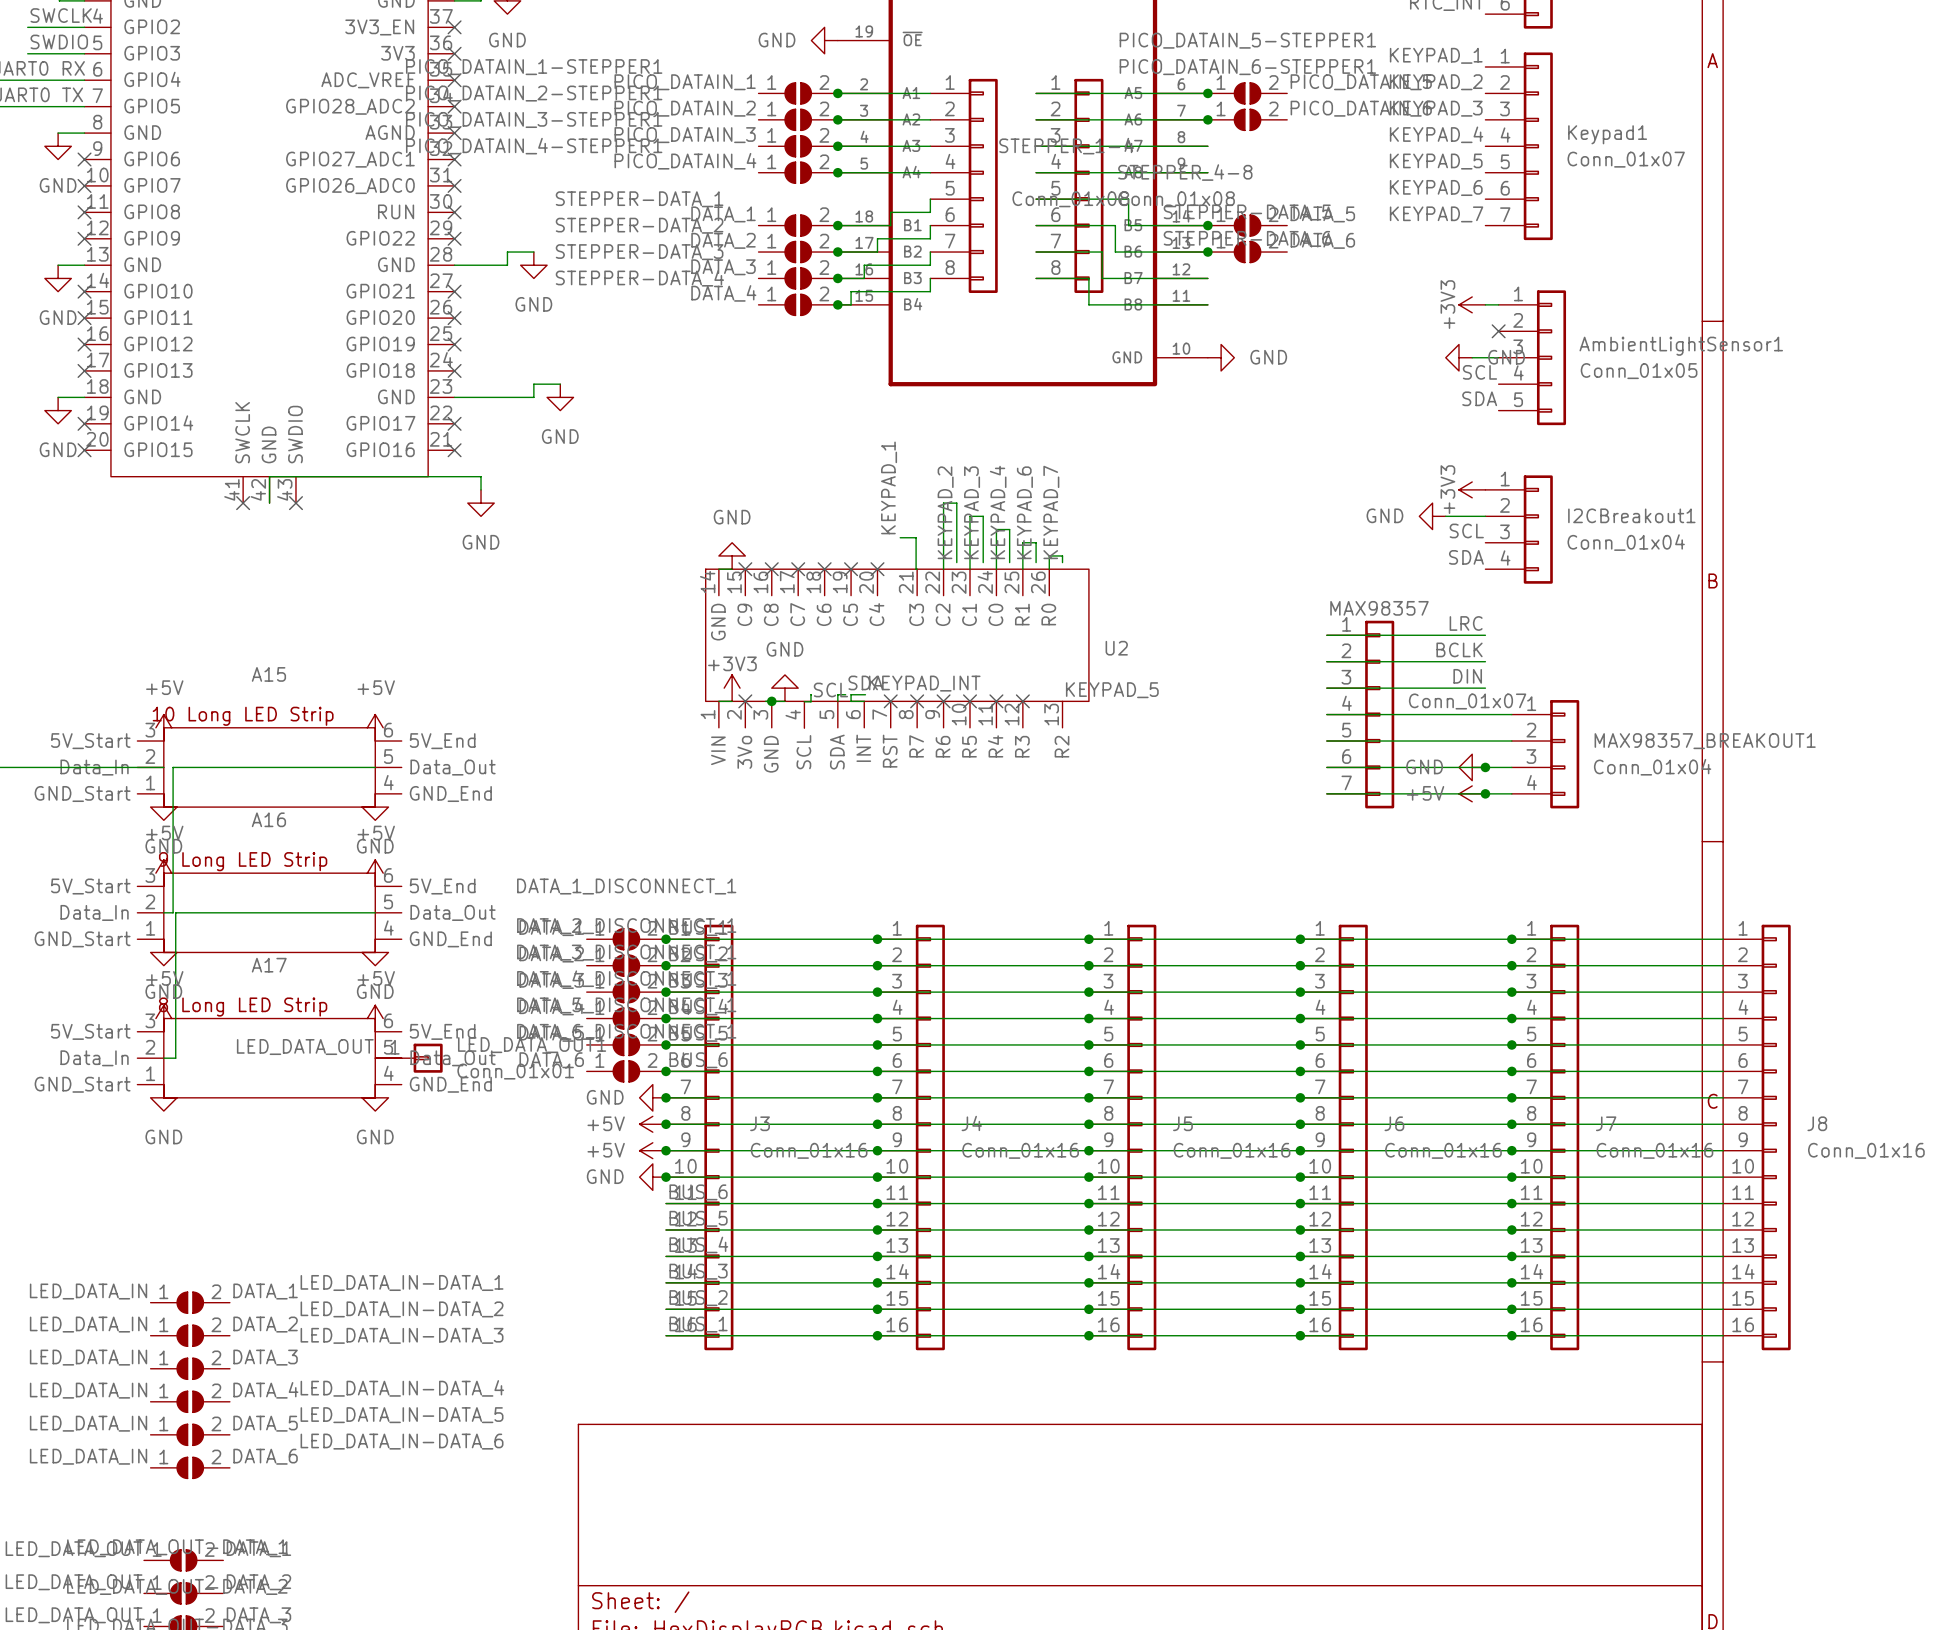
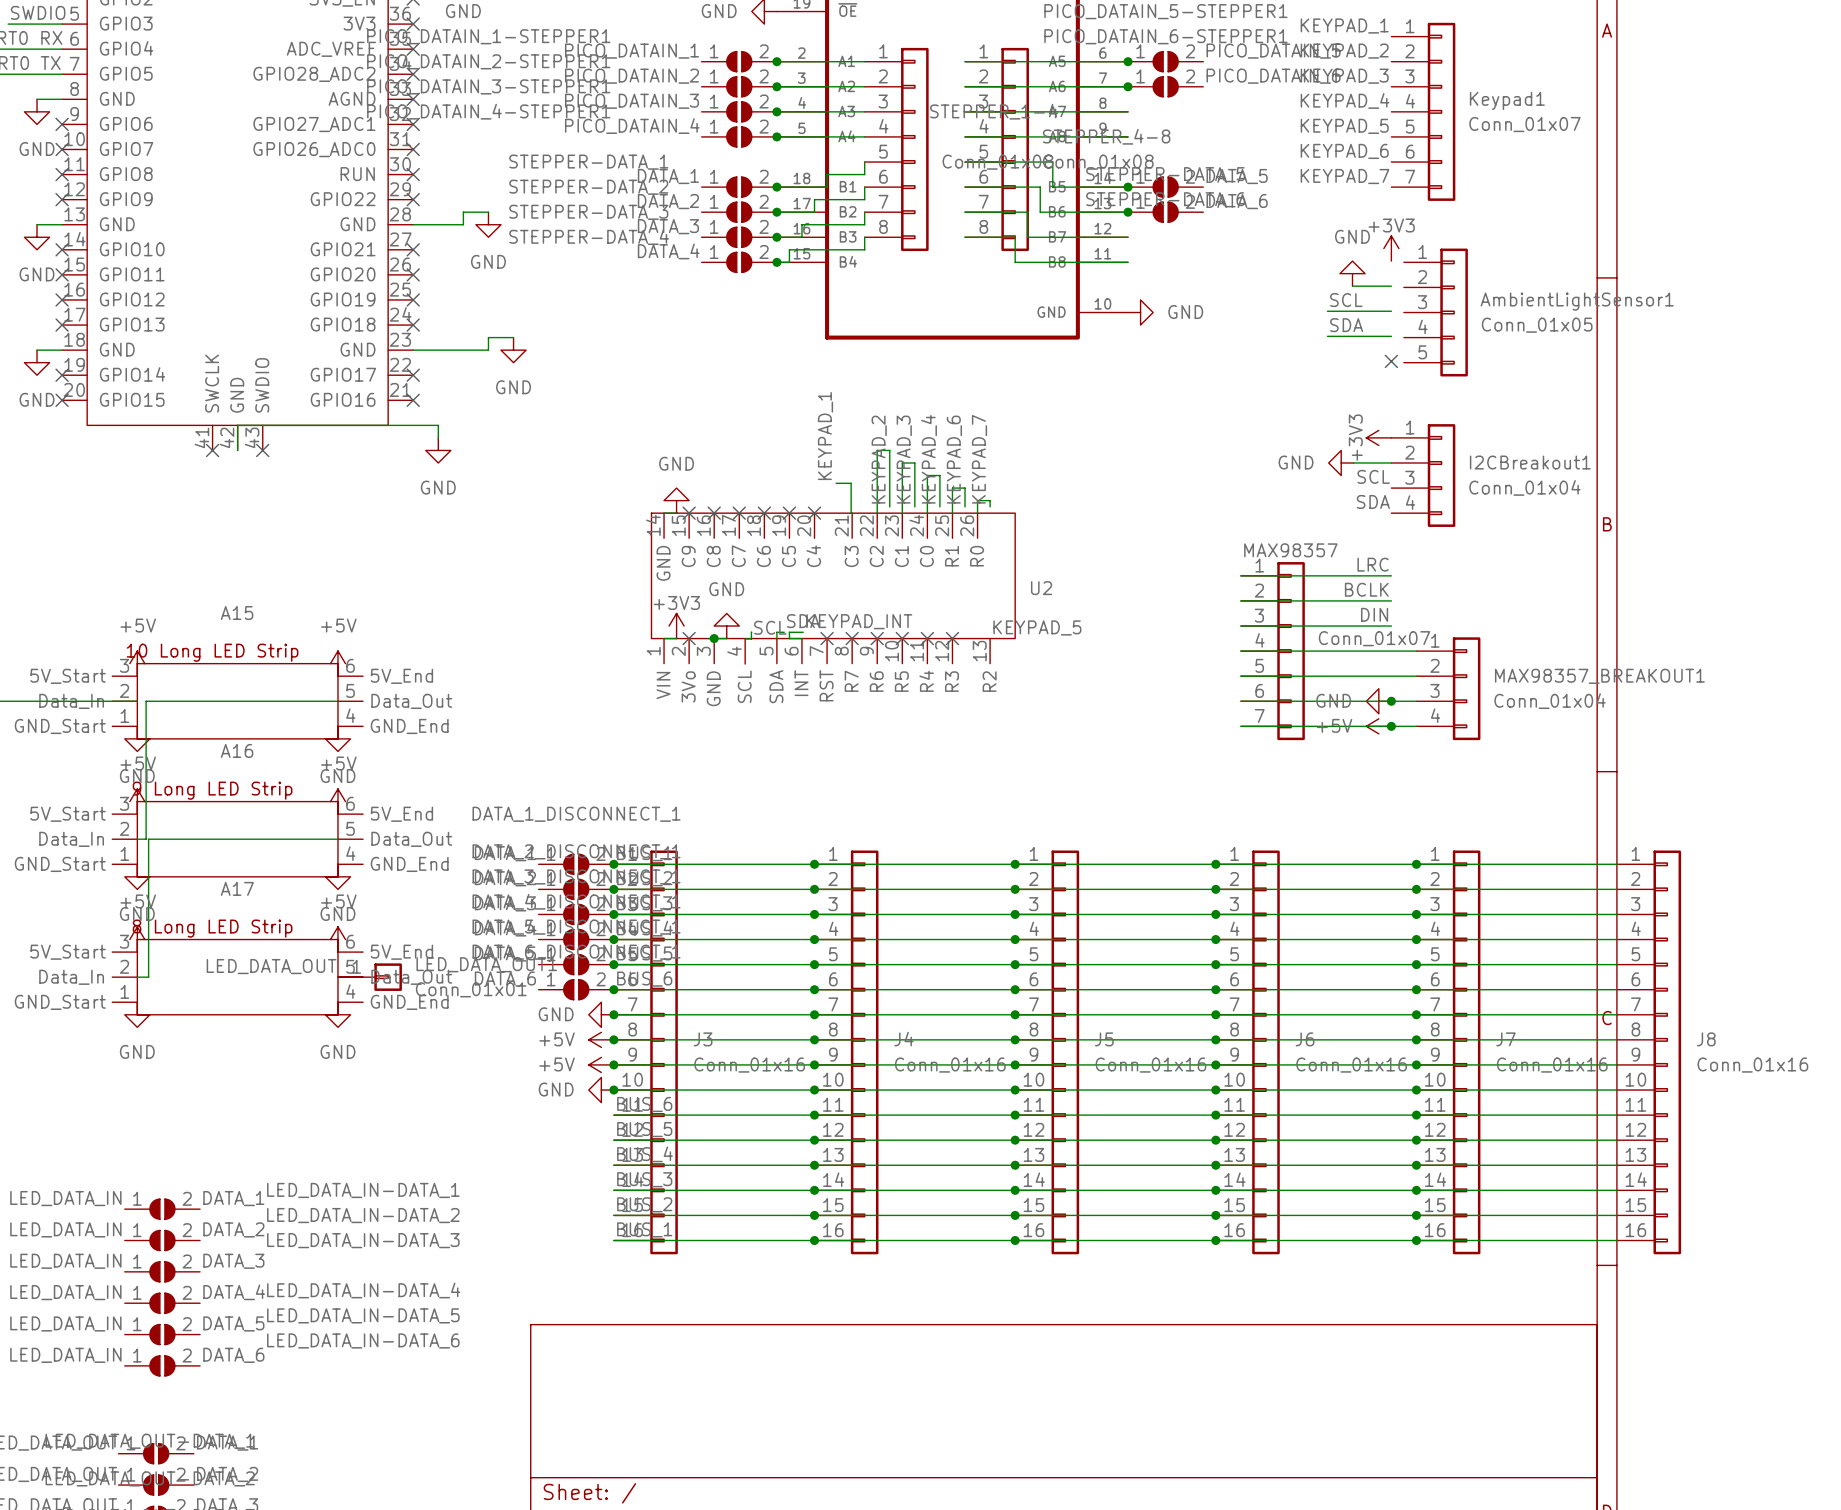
power symbol rotation: 0° (1472, 304) -> 90° clockwise (1391, 248)
power symbol position: +3V3 (1472, 304) -> +3V3 (1391, 248)
wire: (1485, 304) (1498, 304) -> none
wire: none -> (1352, 286) (1391, 286)
no-connect mark: (1498, 331) -> none
wire: none -> (1327, 311) (1391, 311)
power symbol rotation: 0° (1458, 357) -> 90° clockwise (1352, 273)
power symbol position: GND (1458, 357) -> GND (1352, 273)
wire: (1472, 357) (1498, 357) -> none
power symbol text position: GND (1506, 357) -> GND (1352, 236)
label position: SCL (1479, 372) -> SCL (1346, 300)
wire: none -> (1327, 336) (1391, 336)
label position: SDA (1479, 398) -> SDA (1346, 325)
no-connect mark: none -> (1391, 361)

